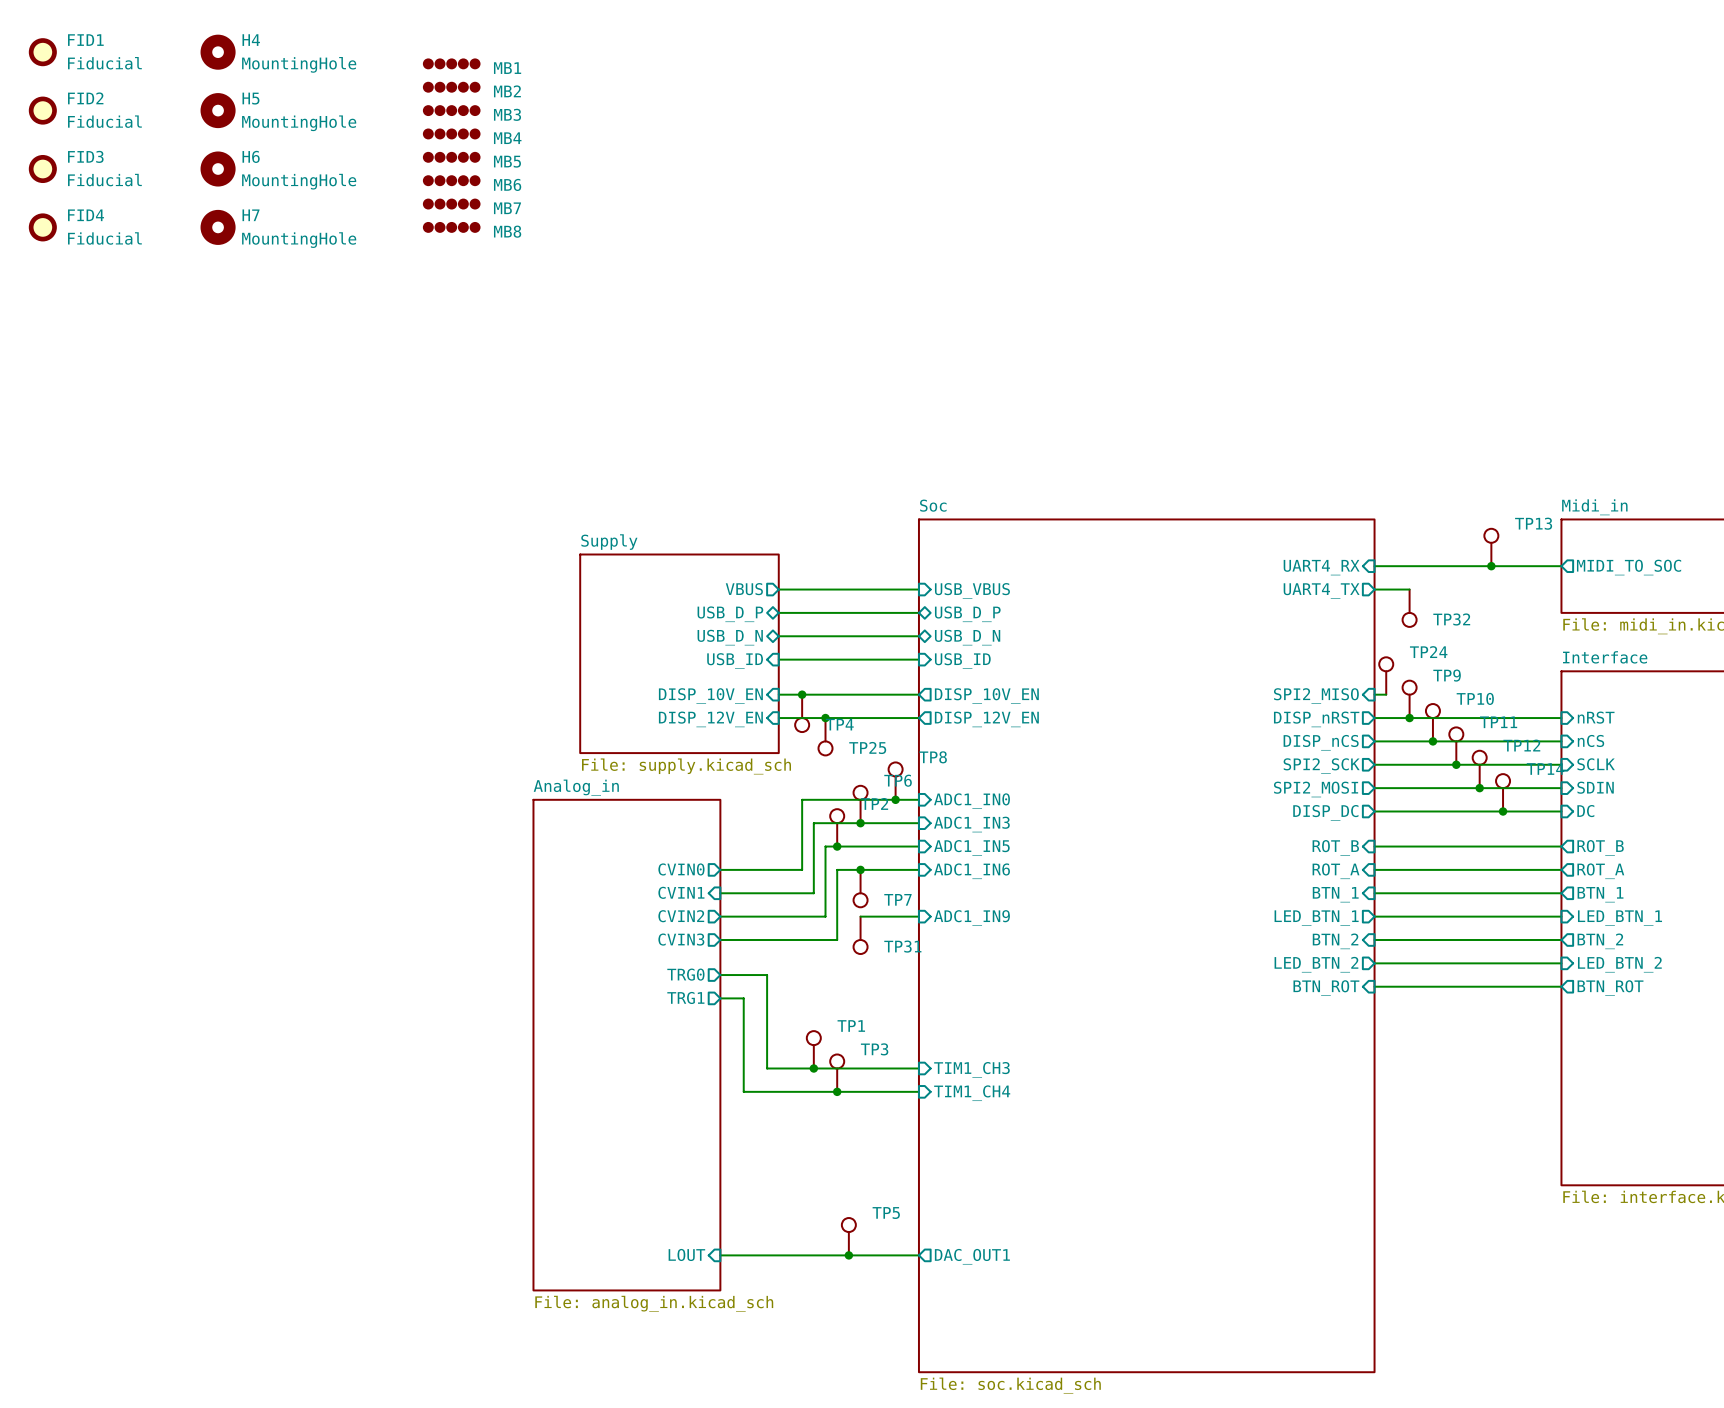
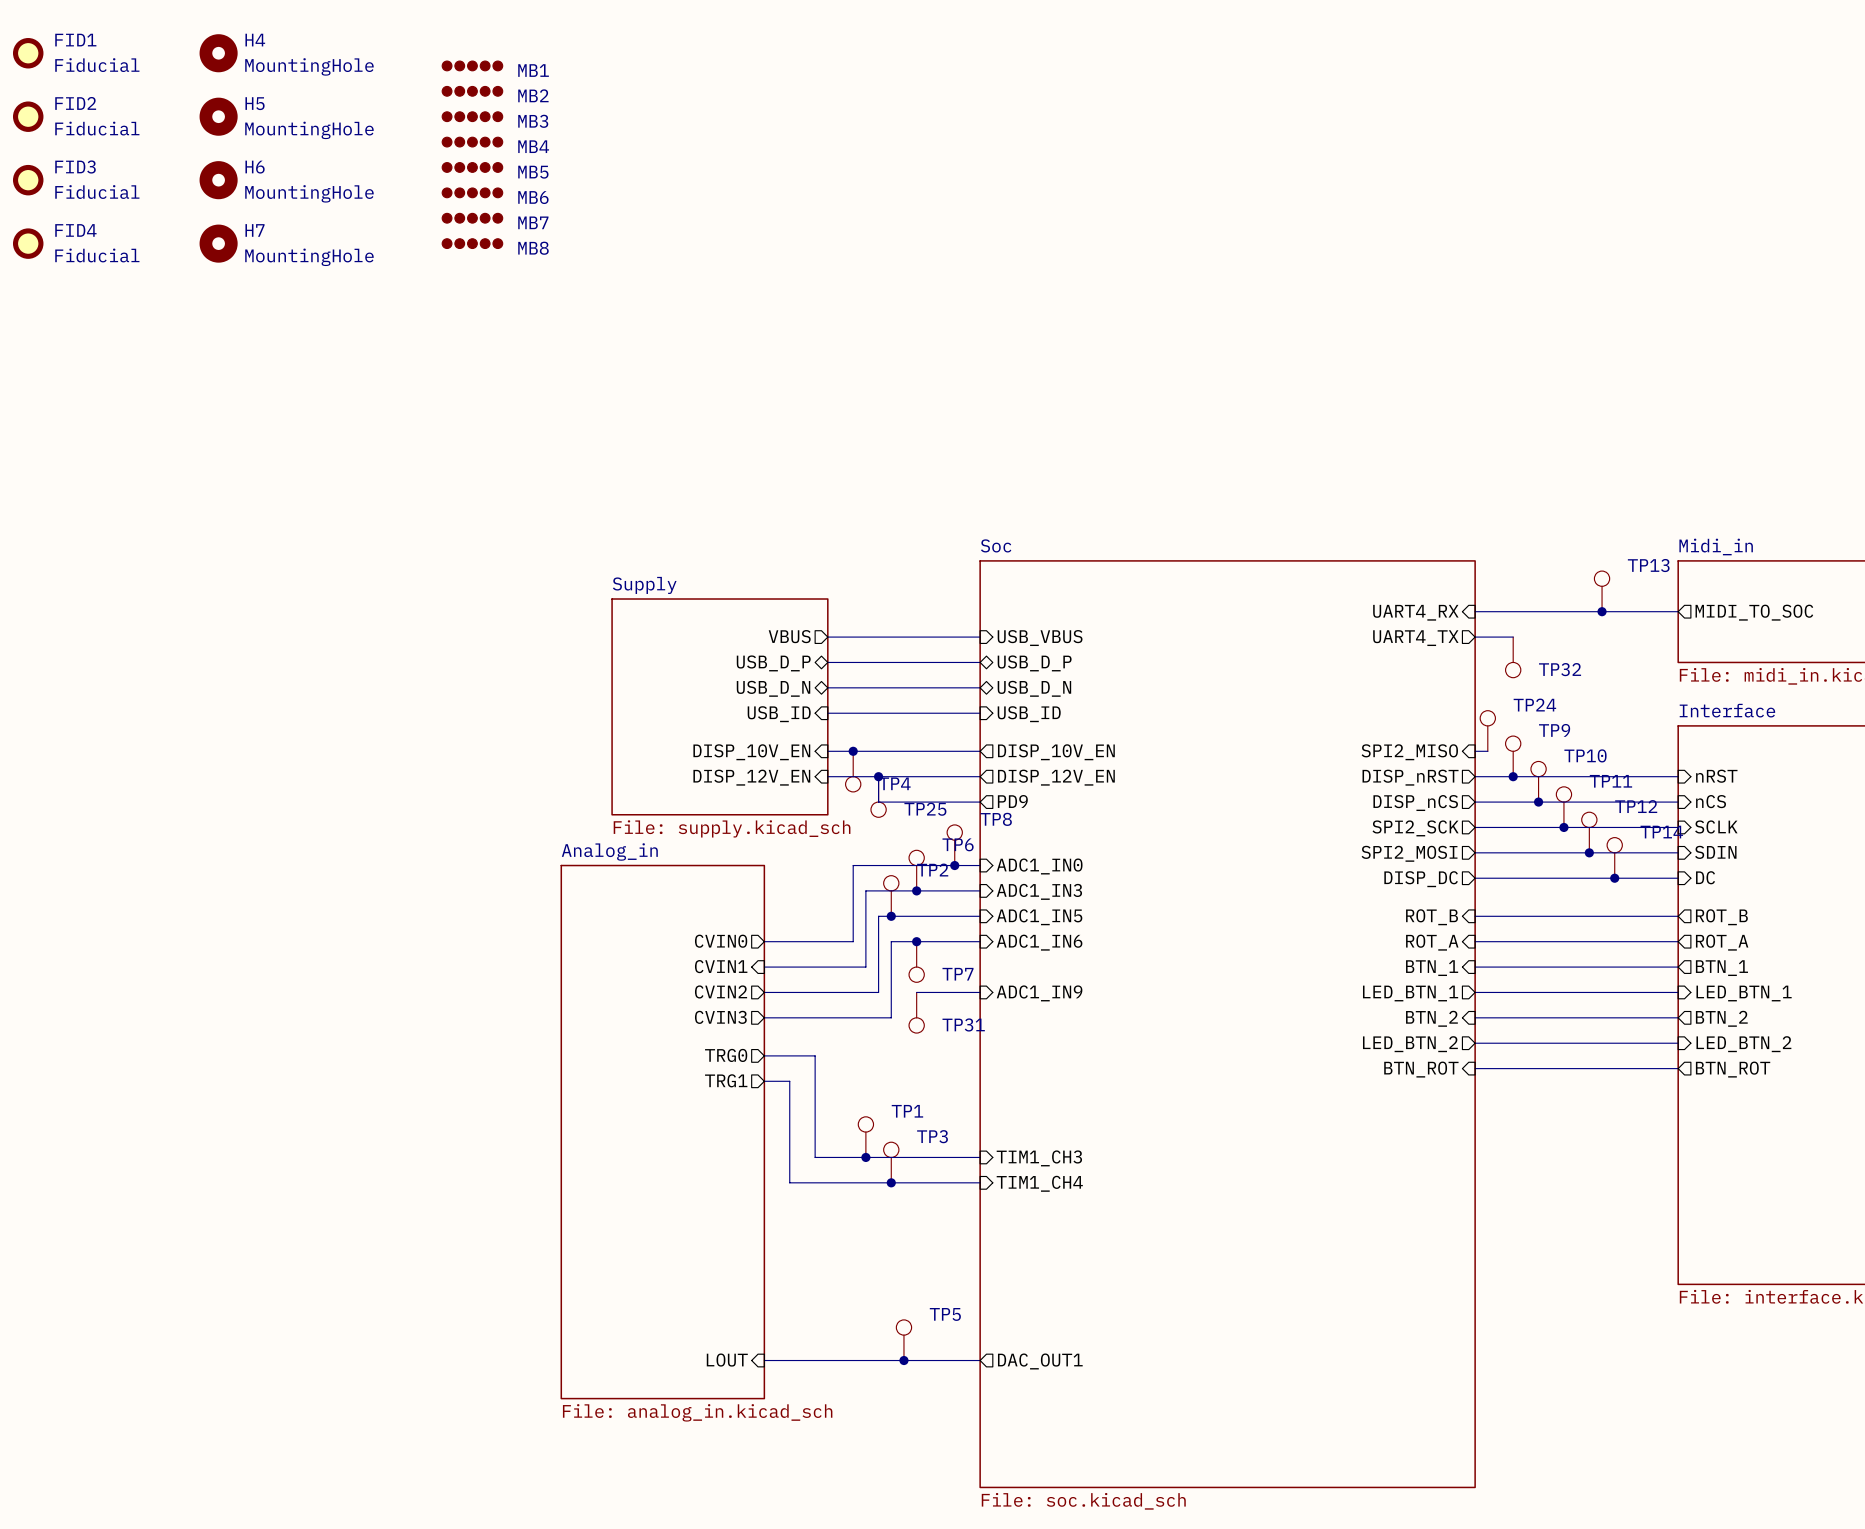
wire: none -> (878, 776) (878, 802) (980, 802)
sheet pin: none -> PD9 (1012, 801)

